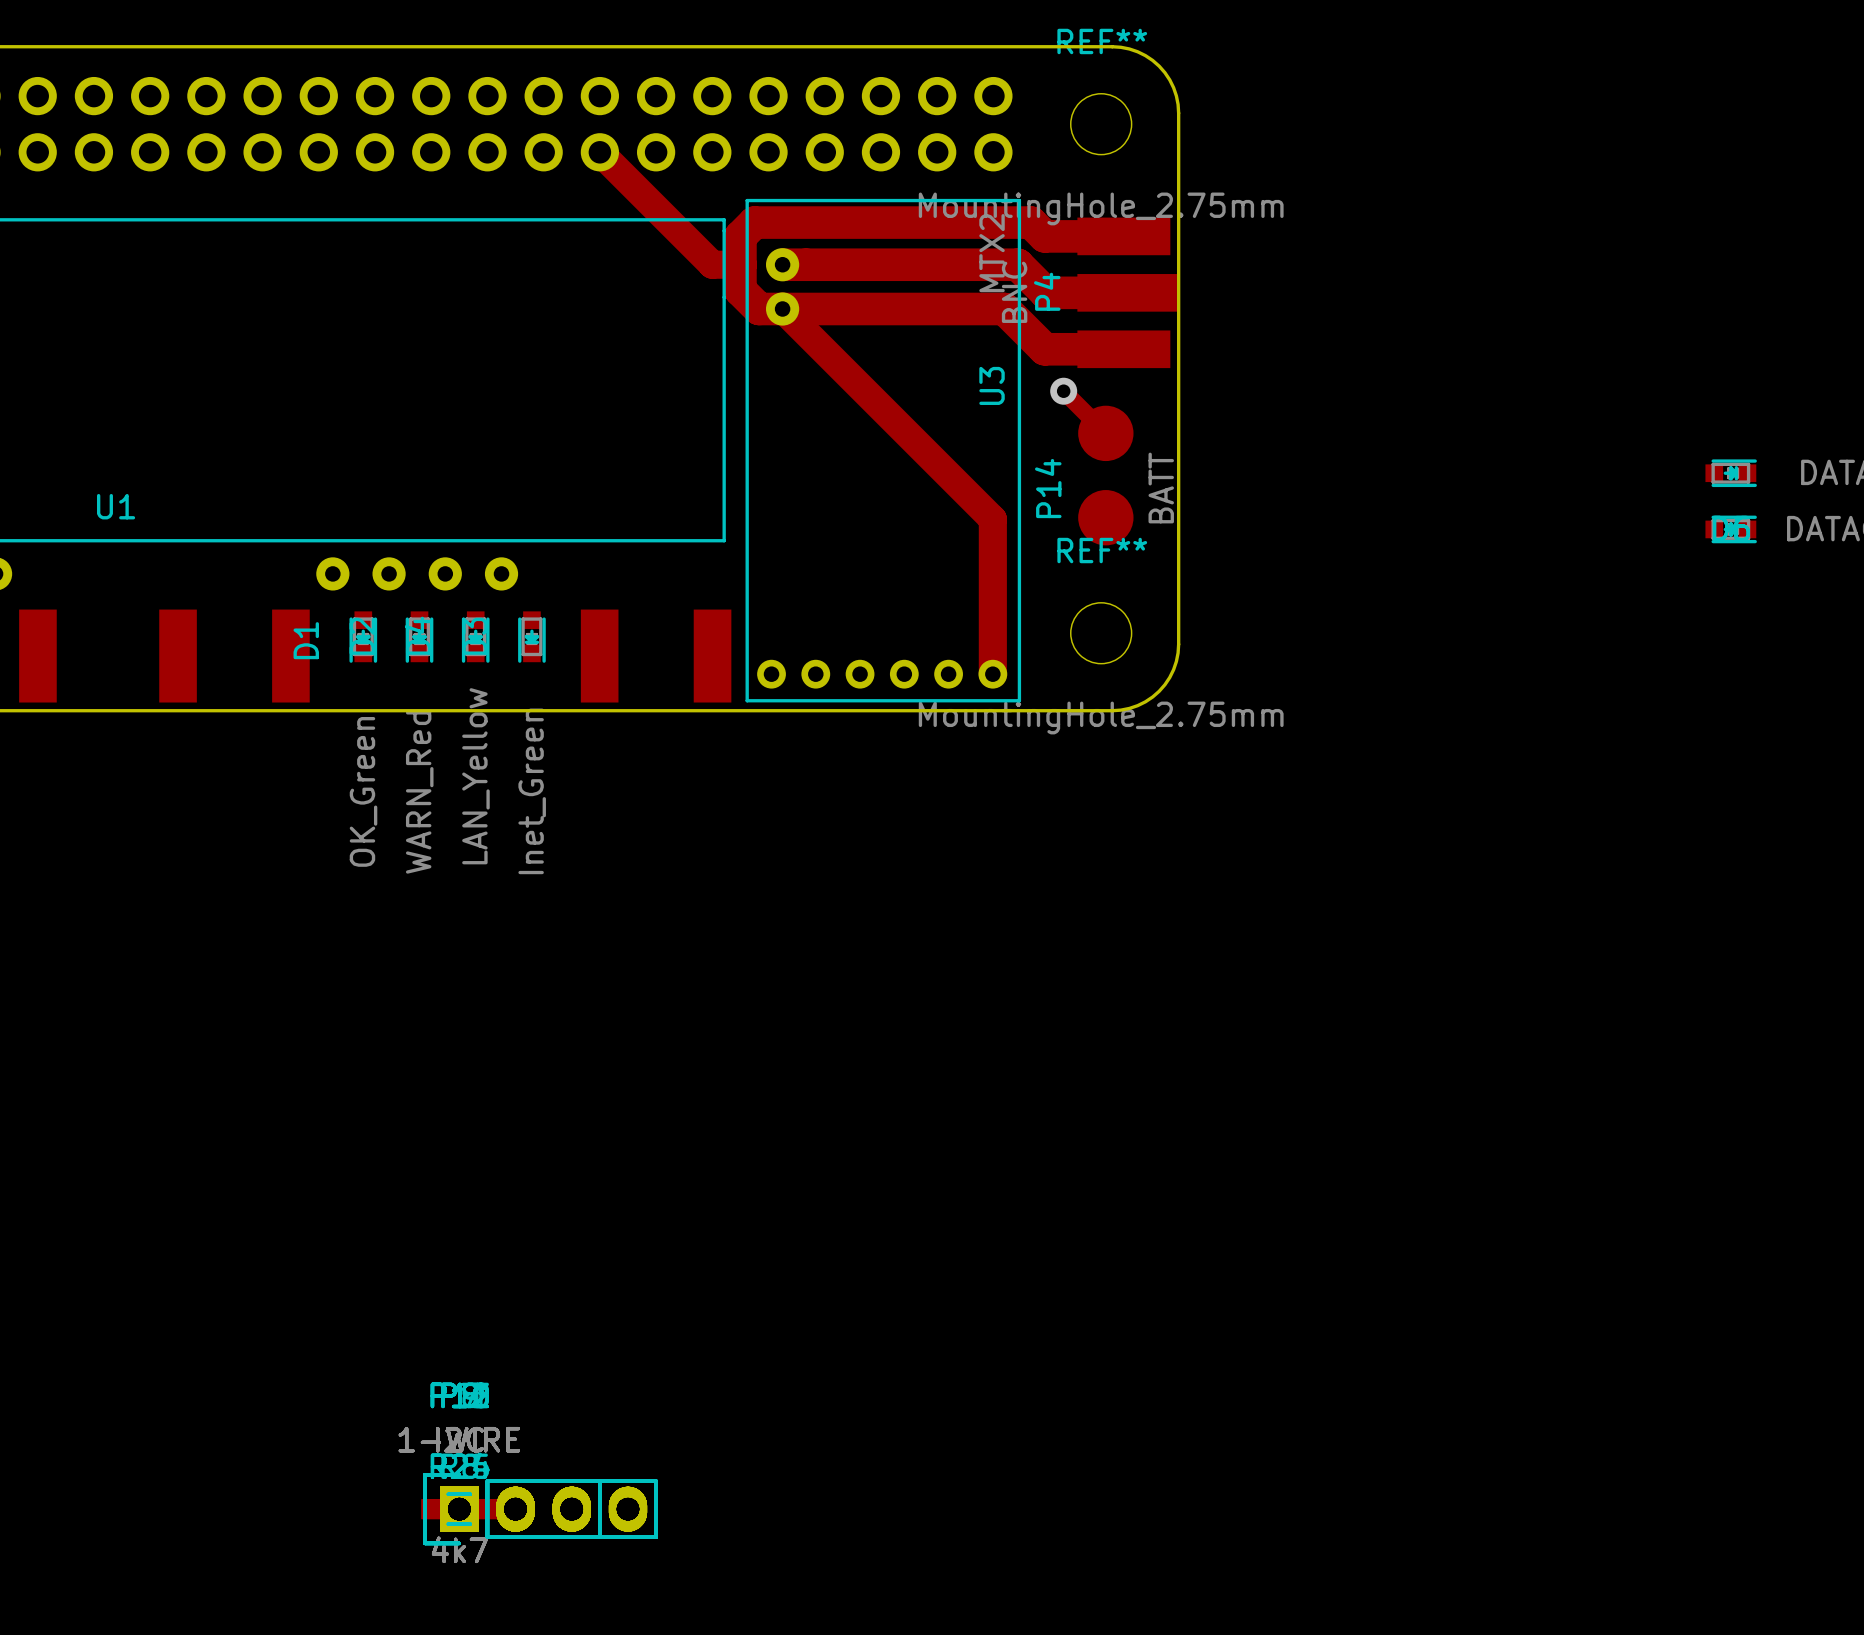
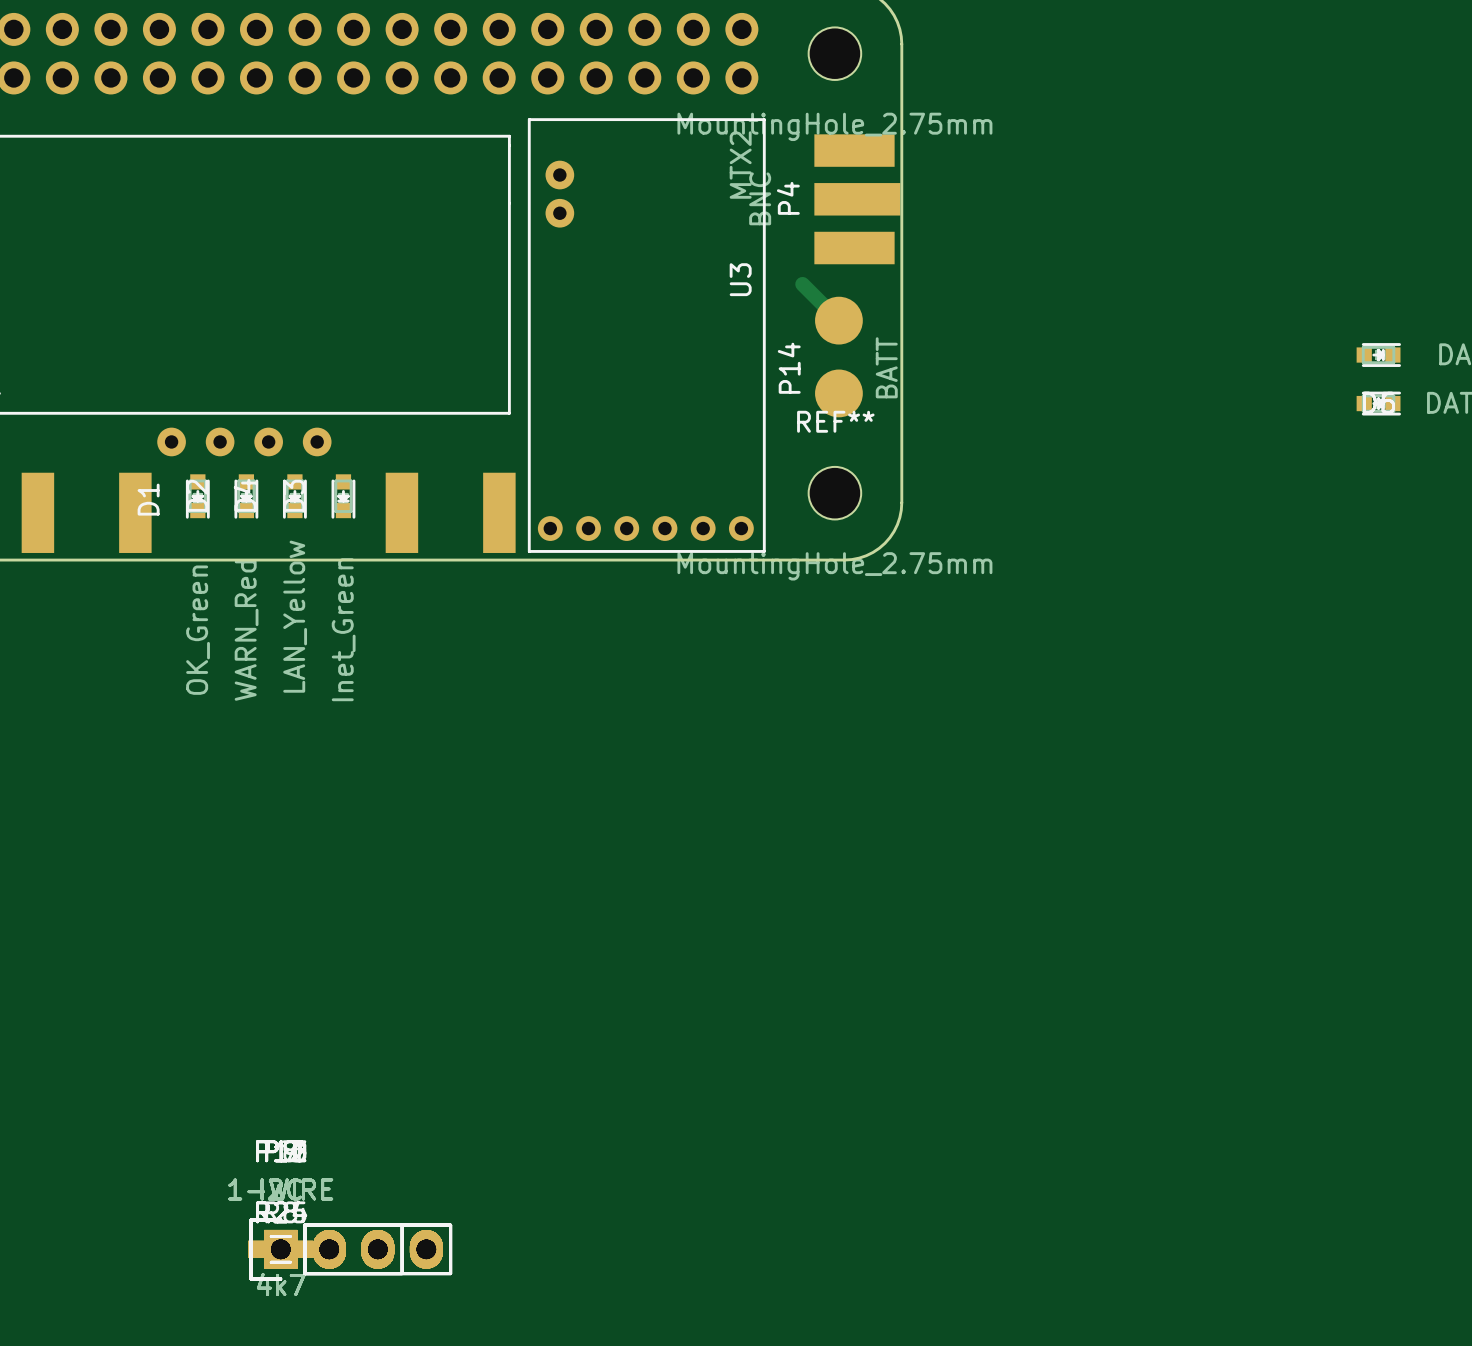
track: (599, 152) (712, 264) (740, 264) -> none
track: (1123, 236) (1044, 236) (1030, 222) (754, 222) (740, 236) (740, 290) (759, 309) (1004, 309) (1044, 349) (1123, 349) -> none
track: (782, 264) (1017, 264) (1045, 292) (1127, 292) -> none
track: (782, 309) (992, 519) (992, 674) -> none
via: (1063, 391) -> none

